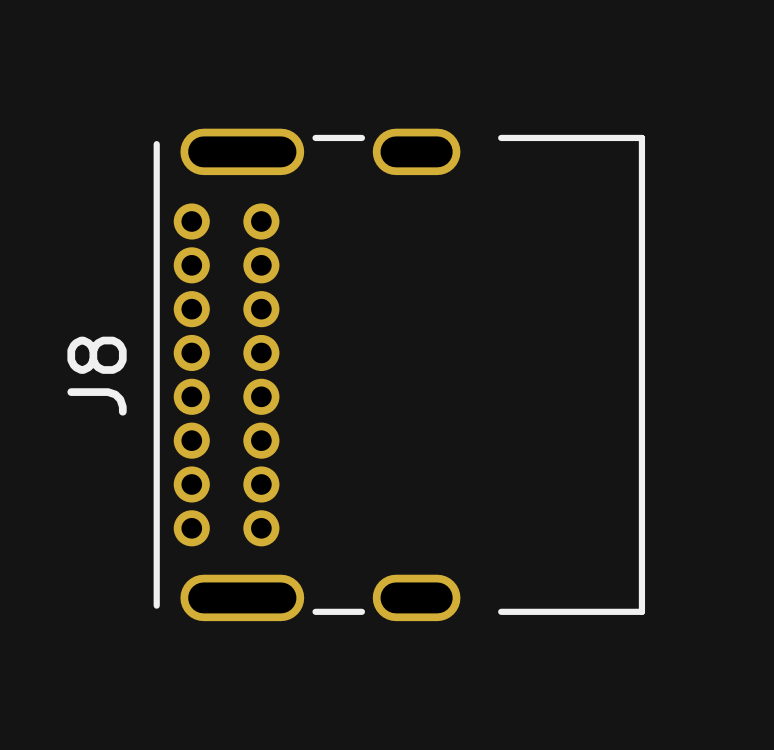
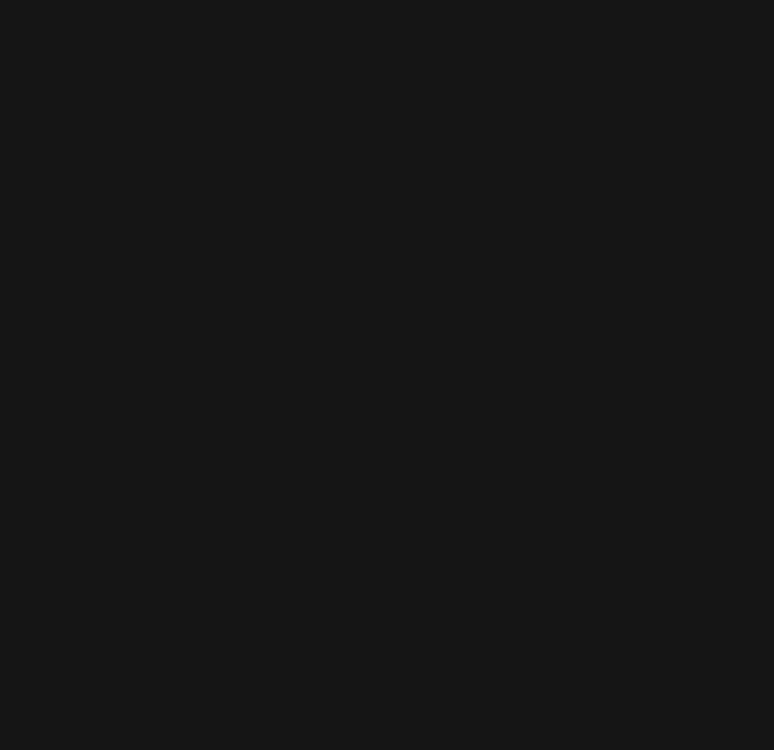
J8: (399, 374) -> none

